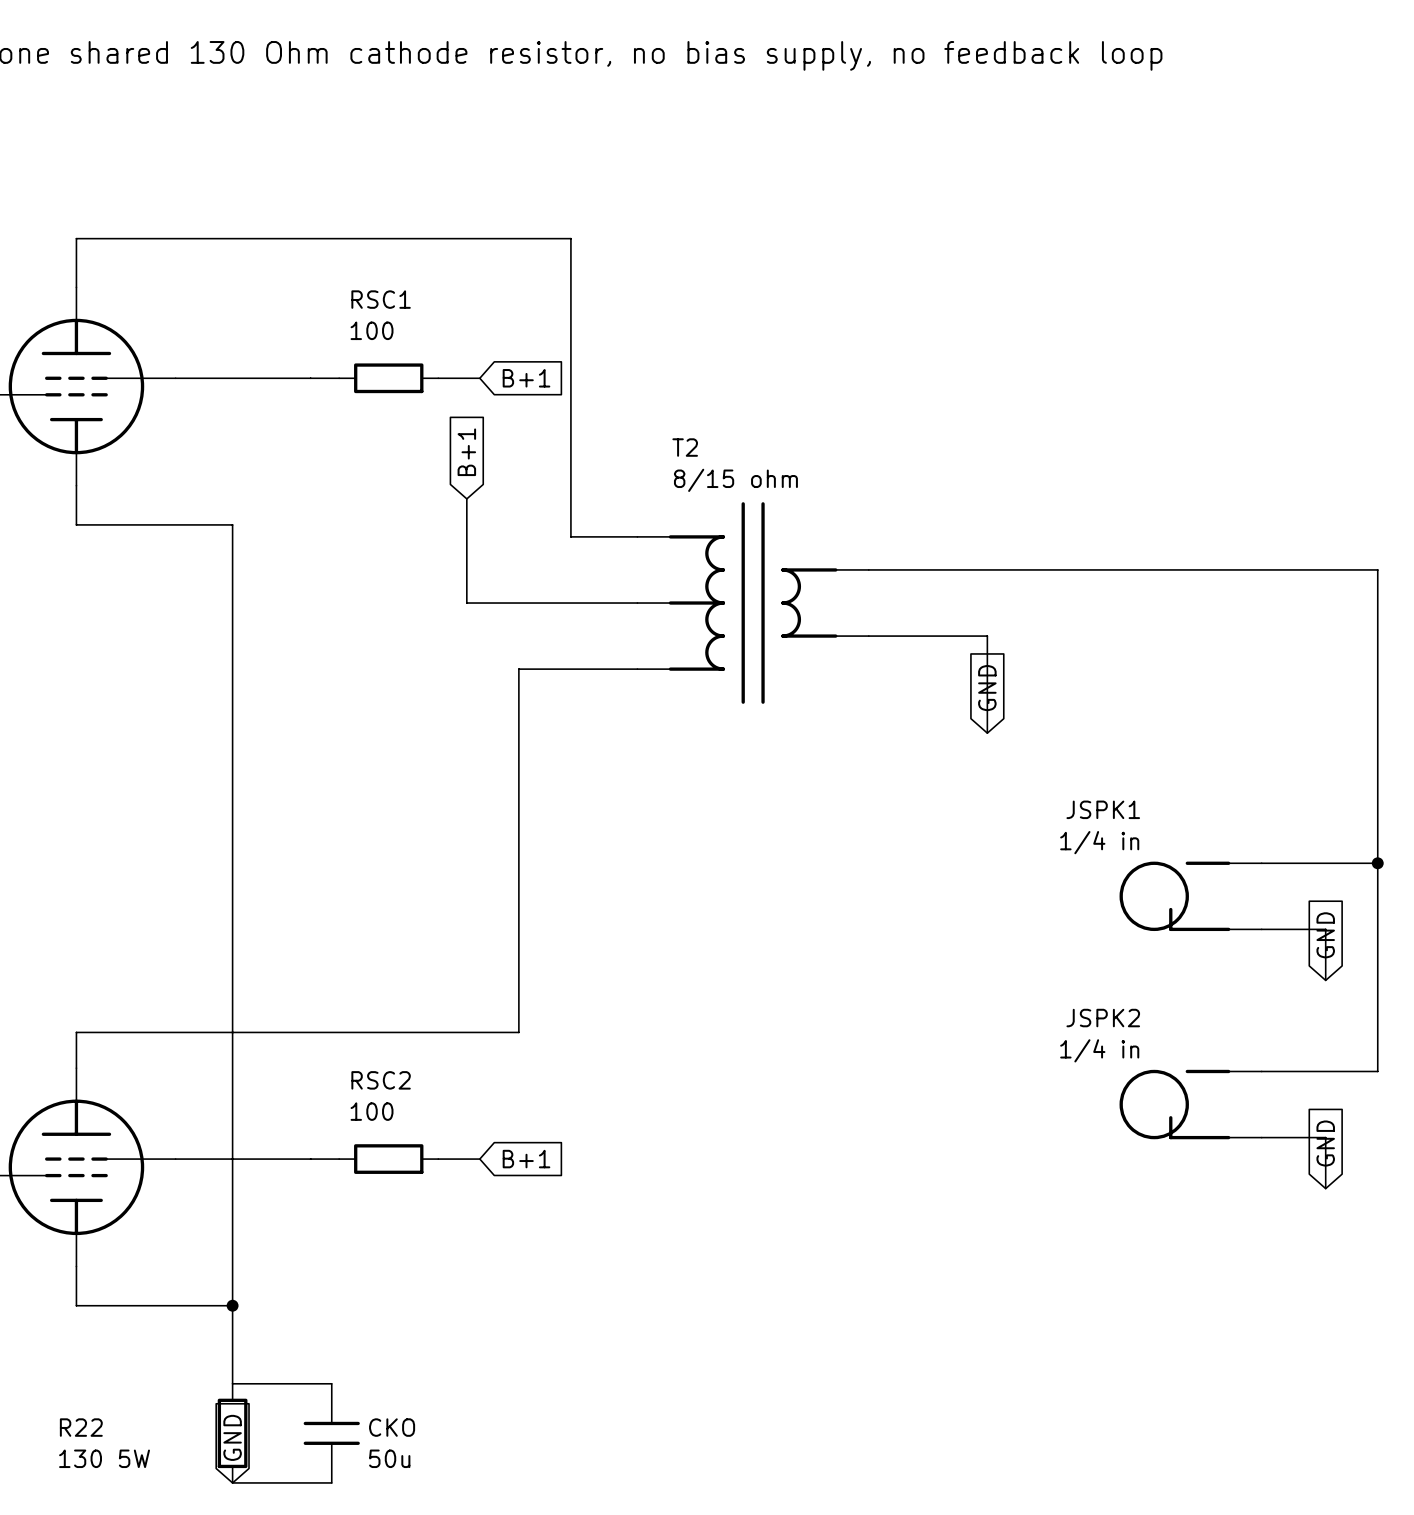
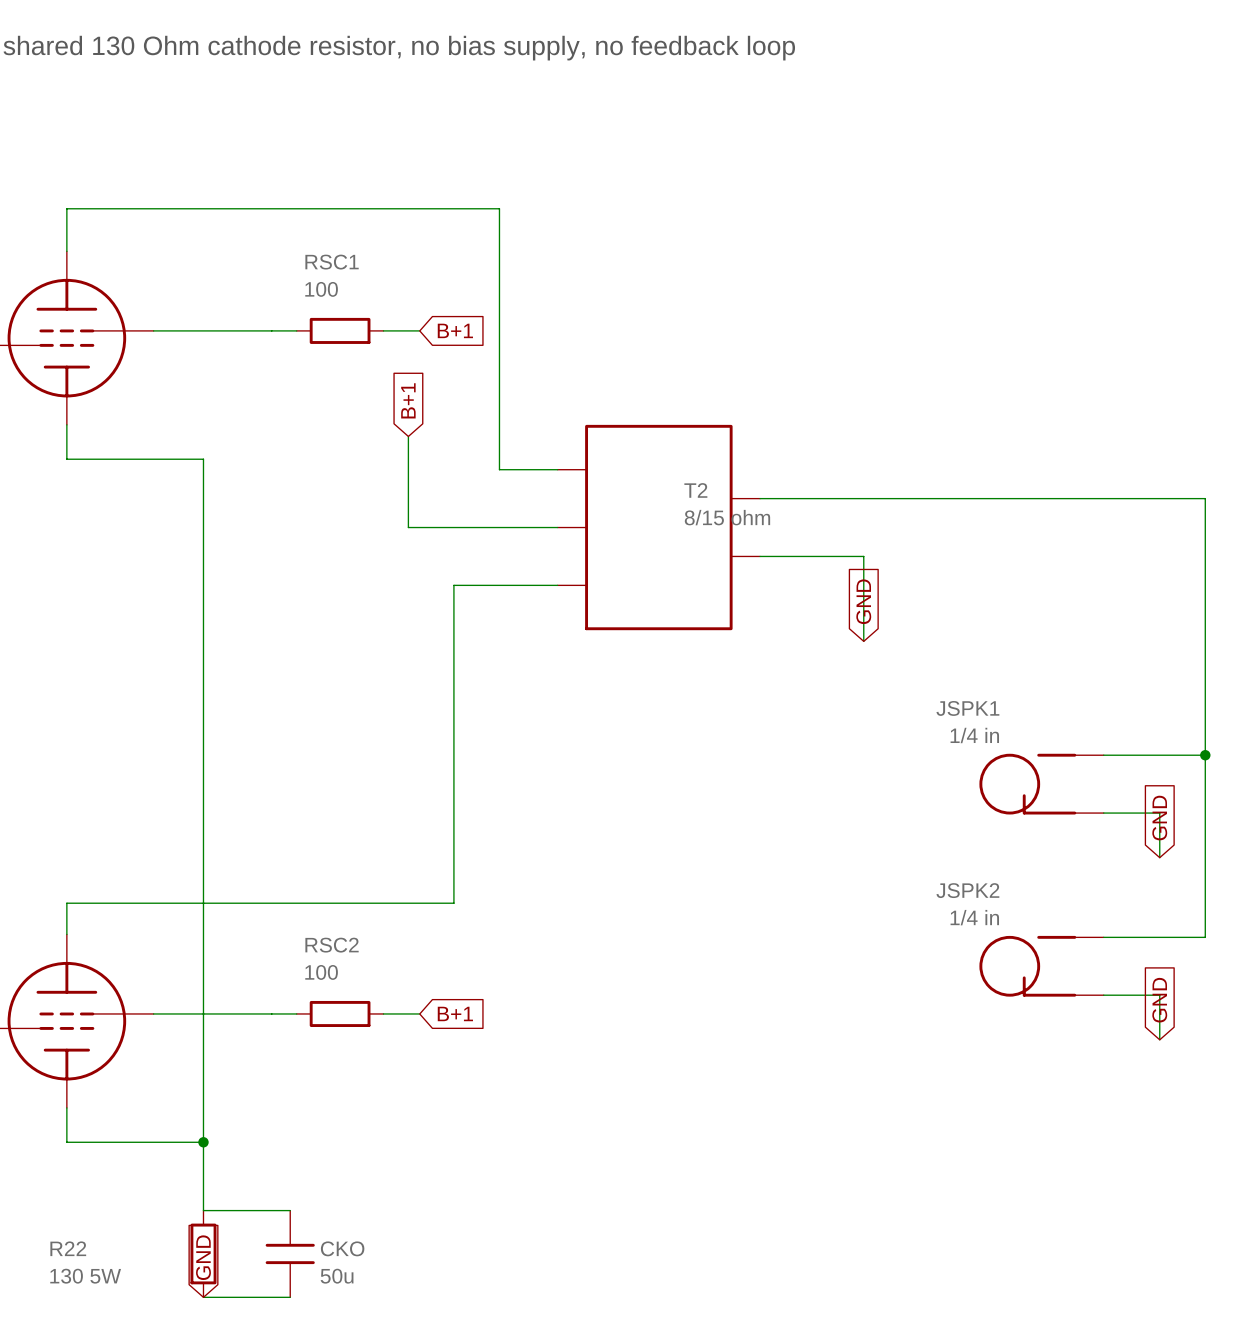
T2 name position: T2 (685, 447) -> T2 (695, 490)
T2 value position: 8/15 ohm (735, 480) -> 8/15 ohm (727, 517)
T2 symbol: [637, 502, 869, 704] -> [557, 424, 761, 631]

